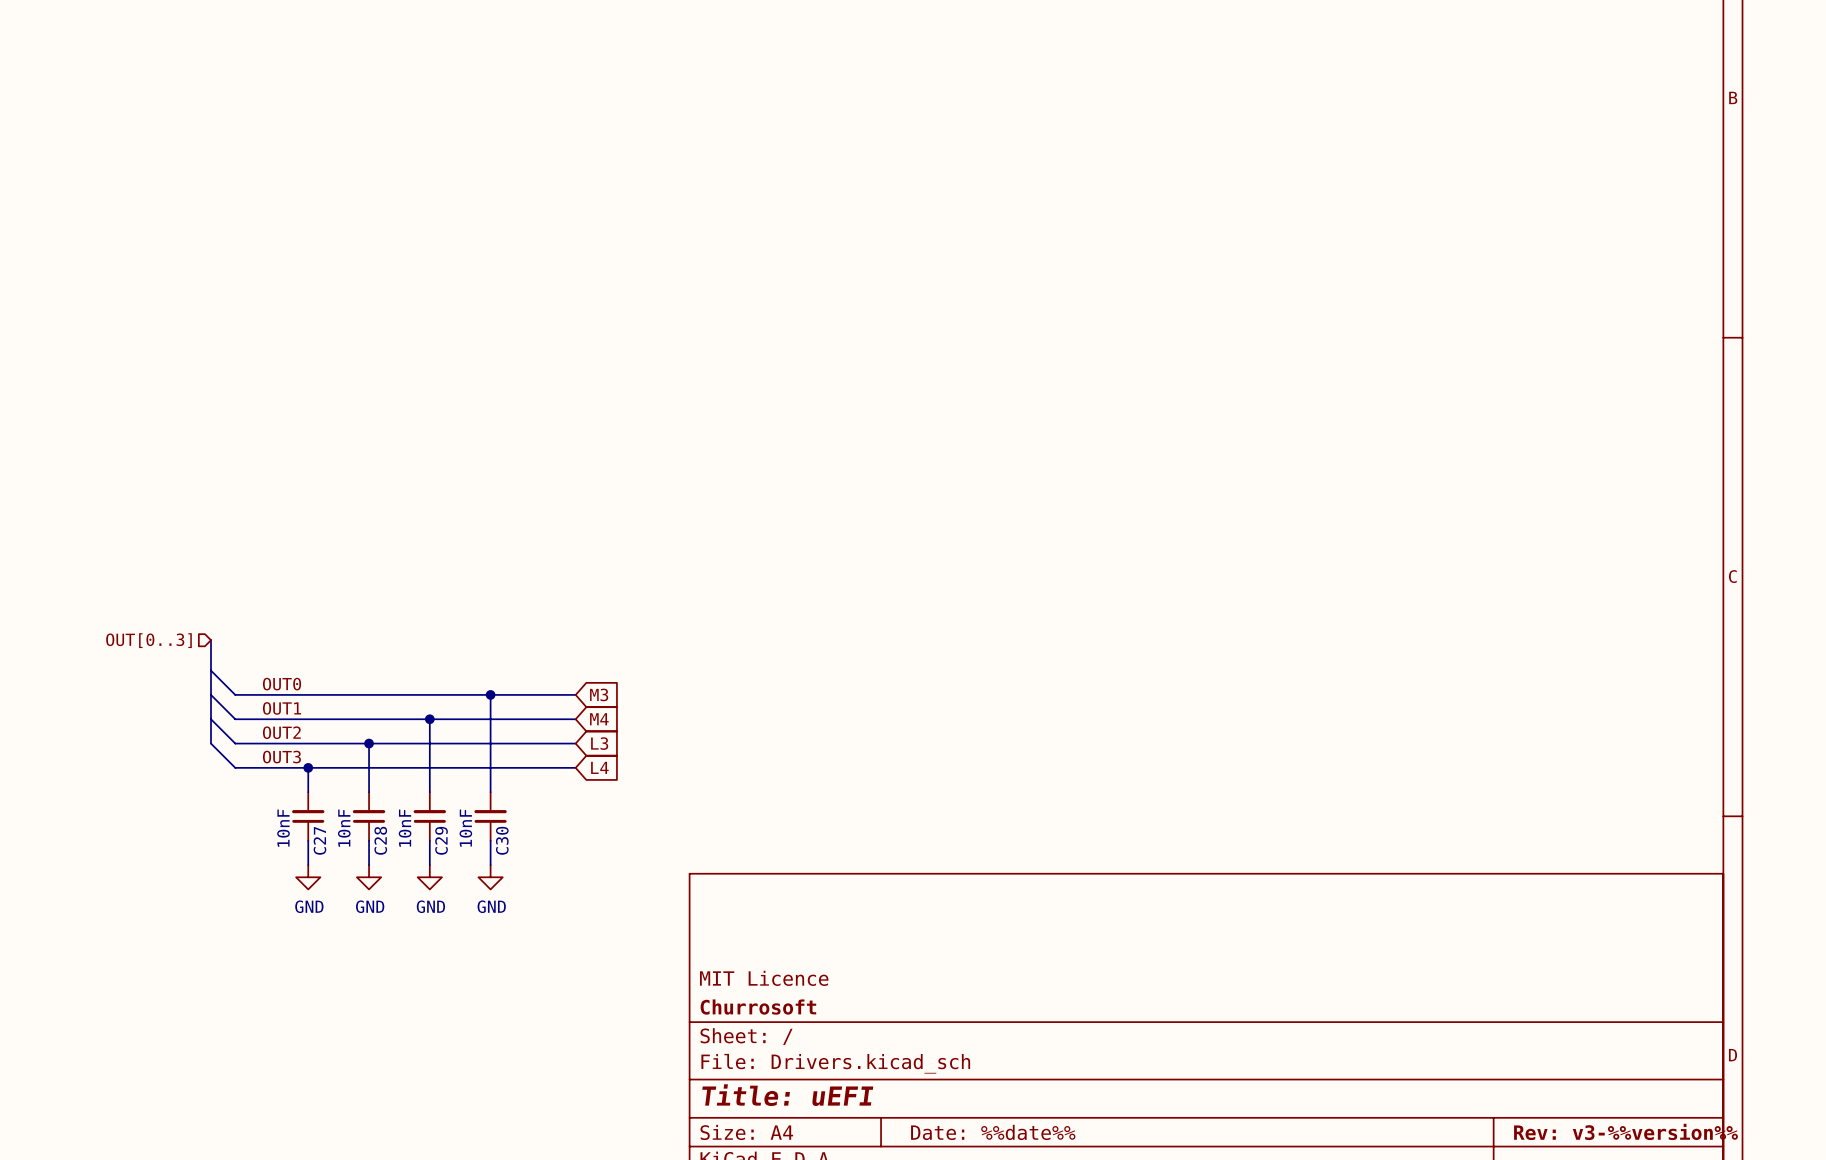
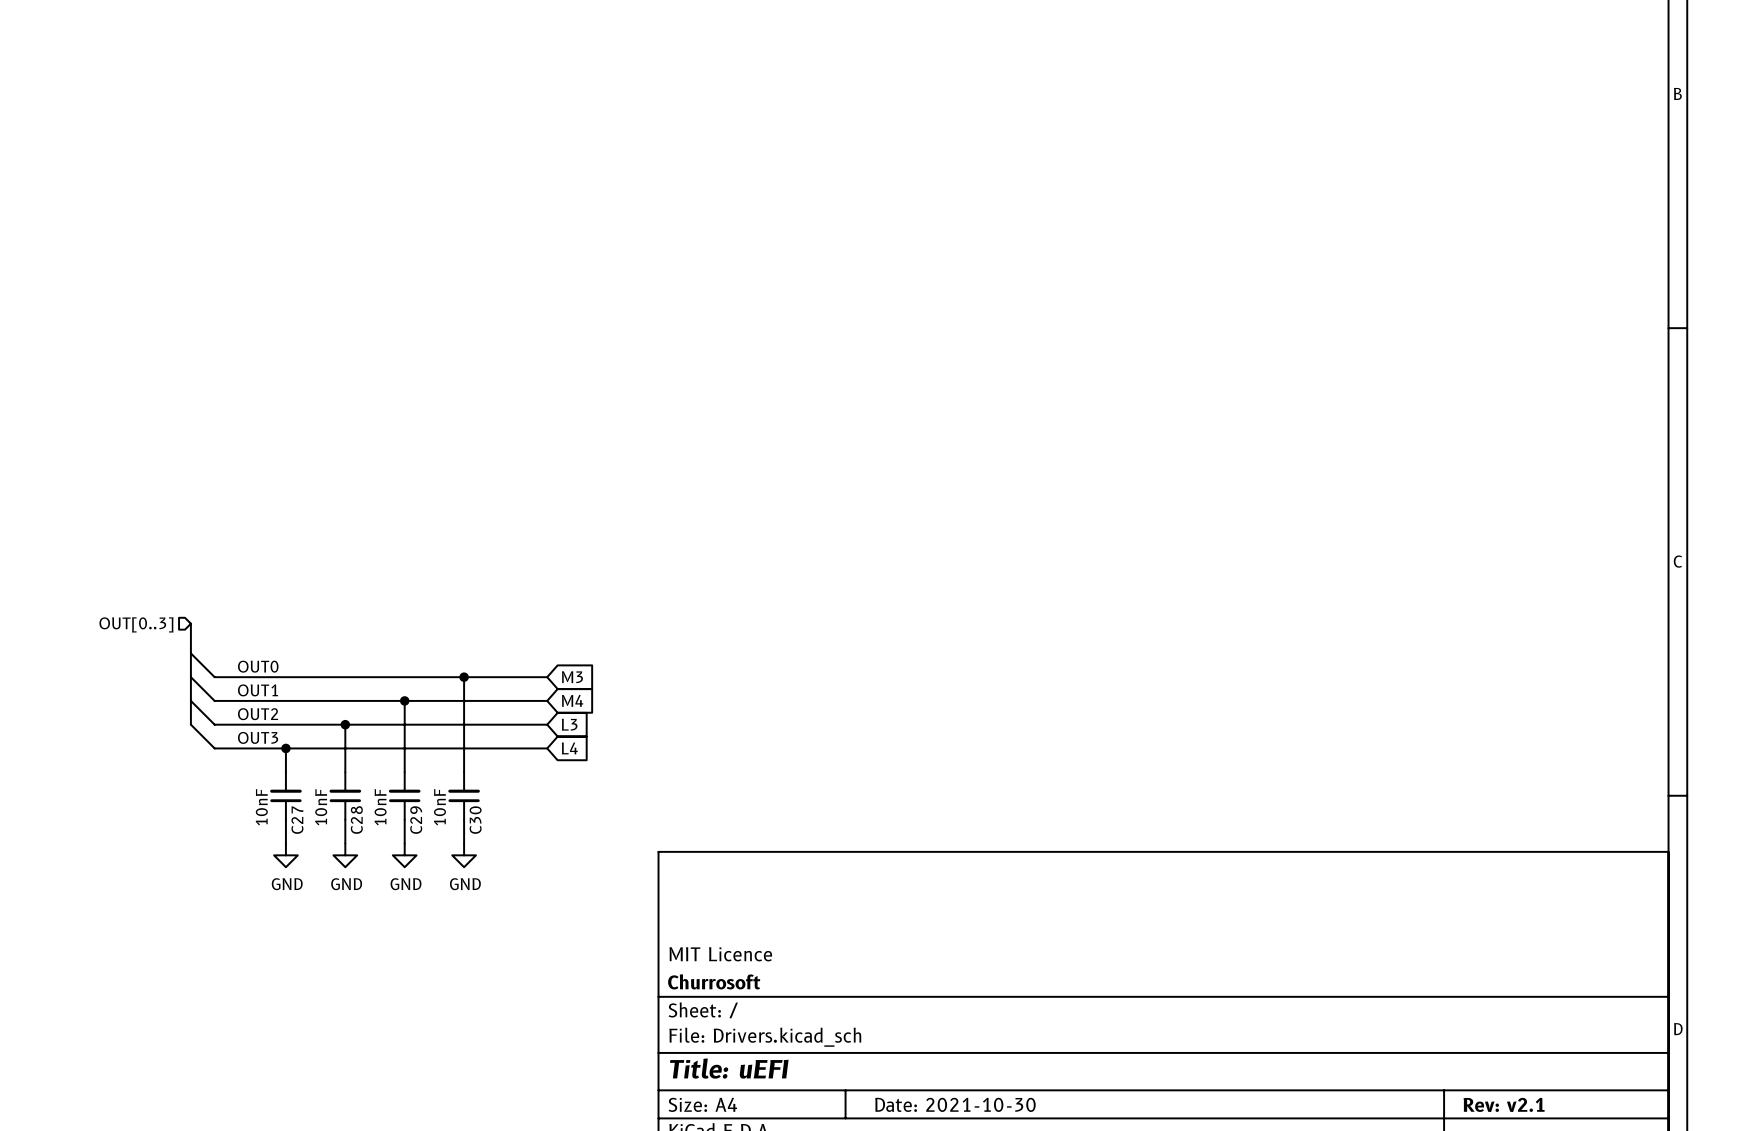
title block: Rev: v3-%%version%% (1625, 1131) -> Rev: v2.1 (1504, 1104)
title block: Date: %%date%% (993, 1132) -> Date: 2021-10-30 (955, 1104)

